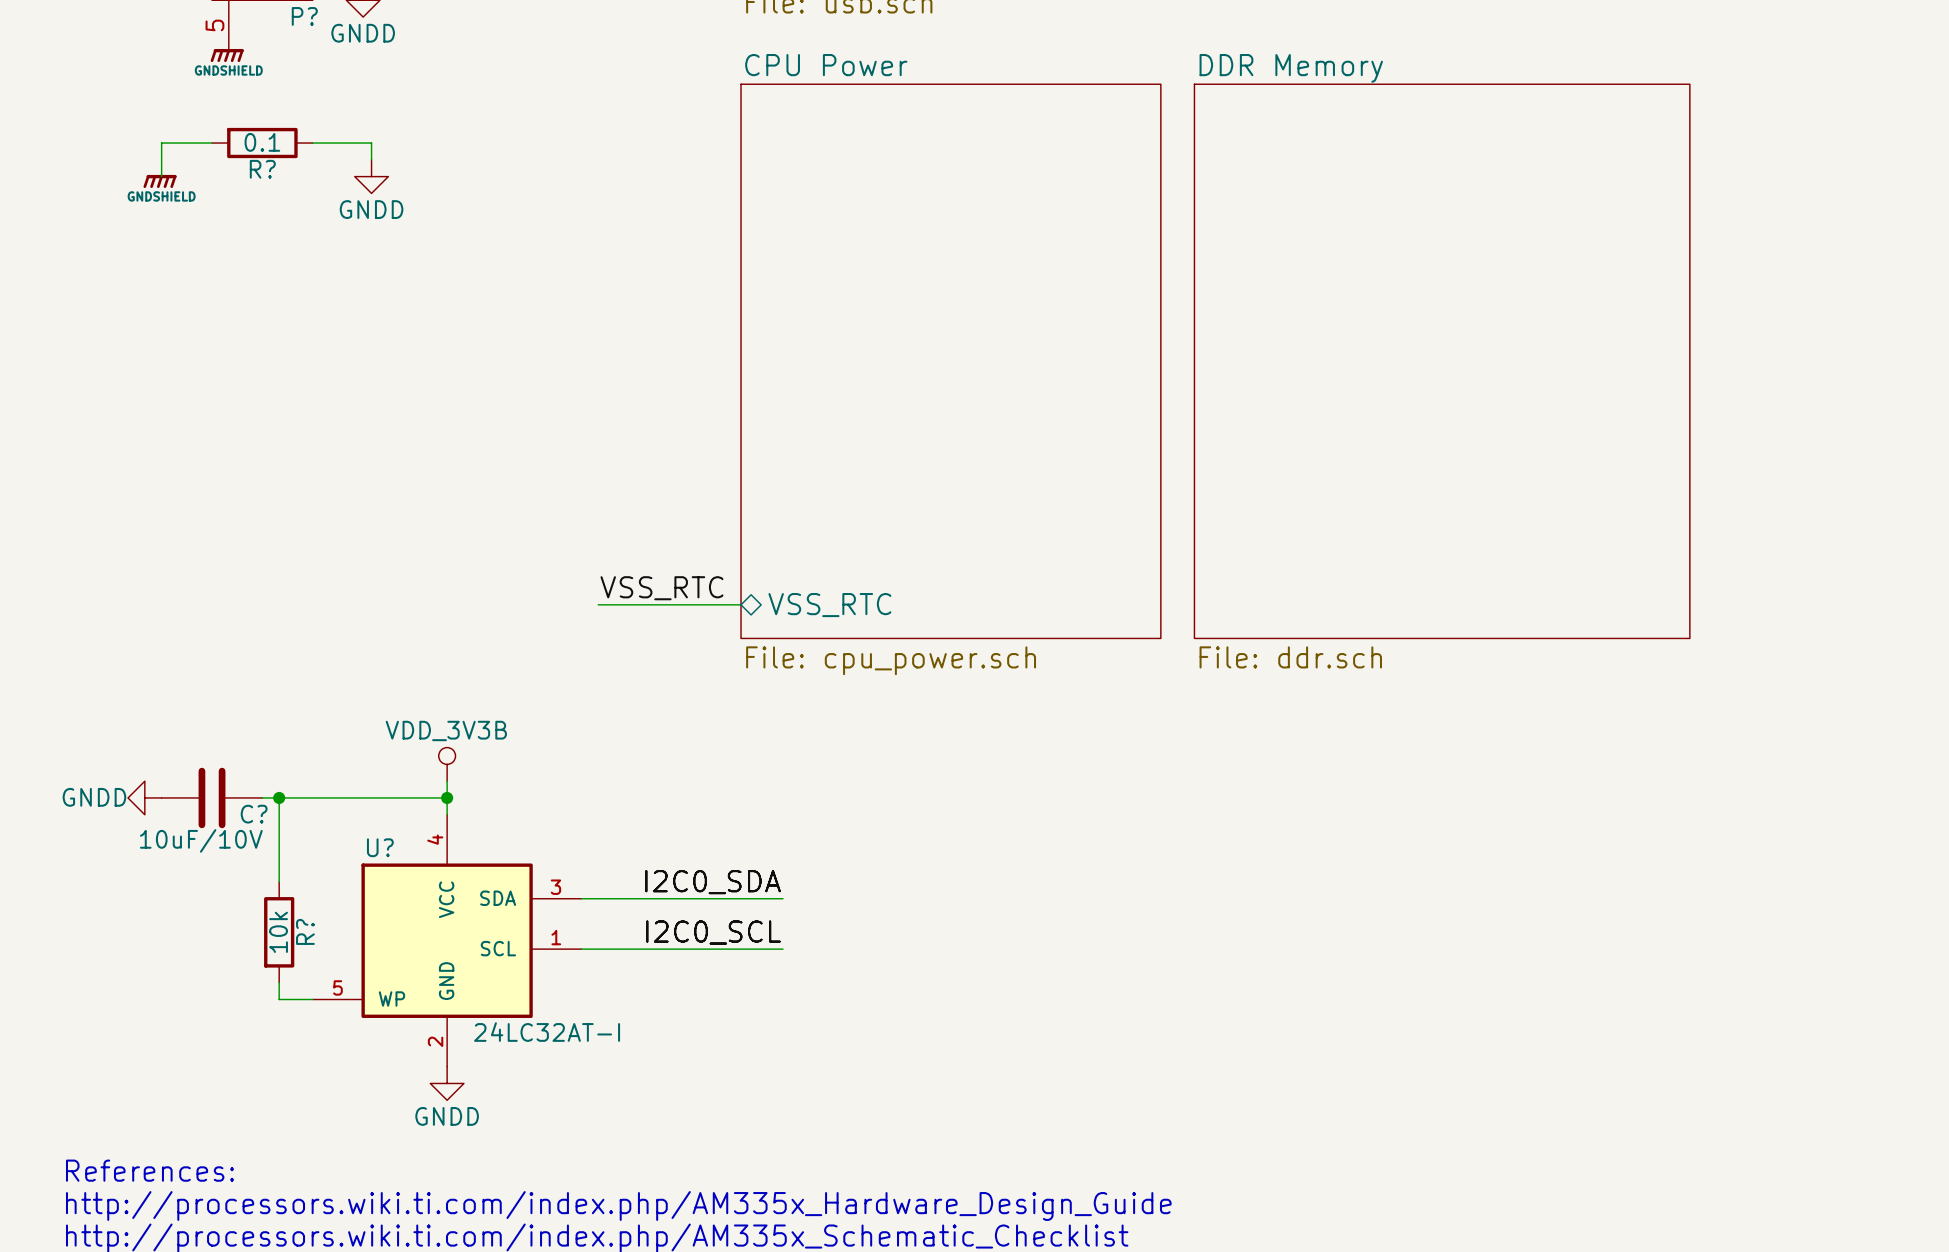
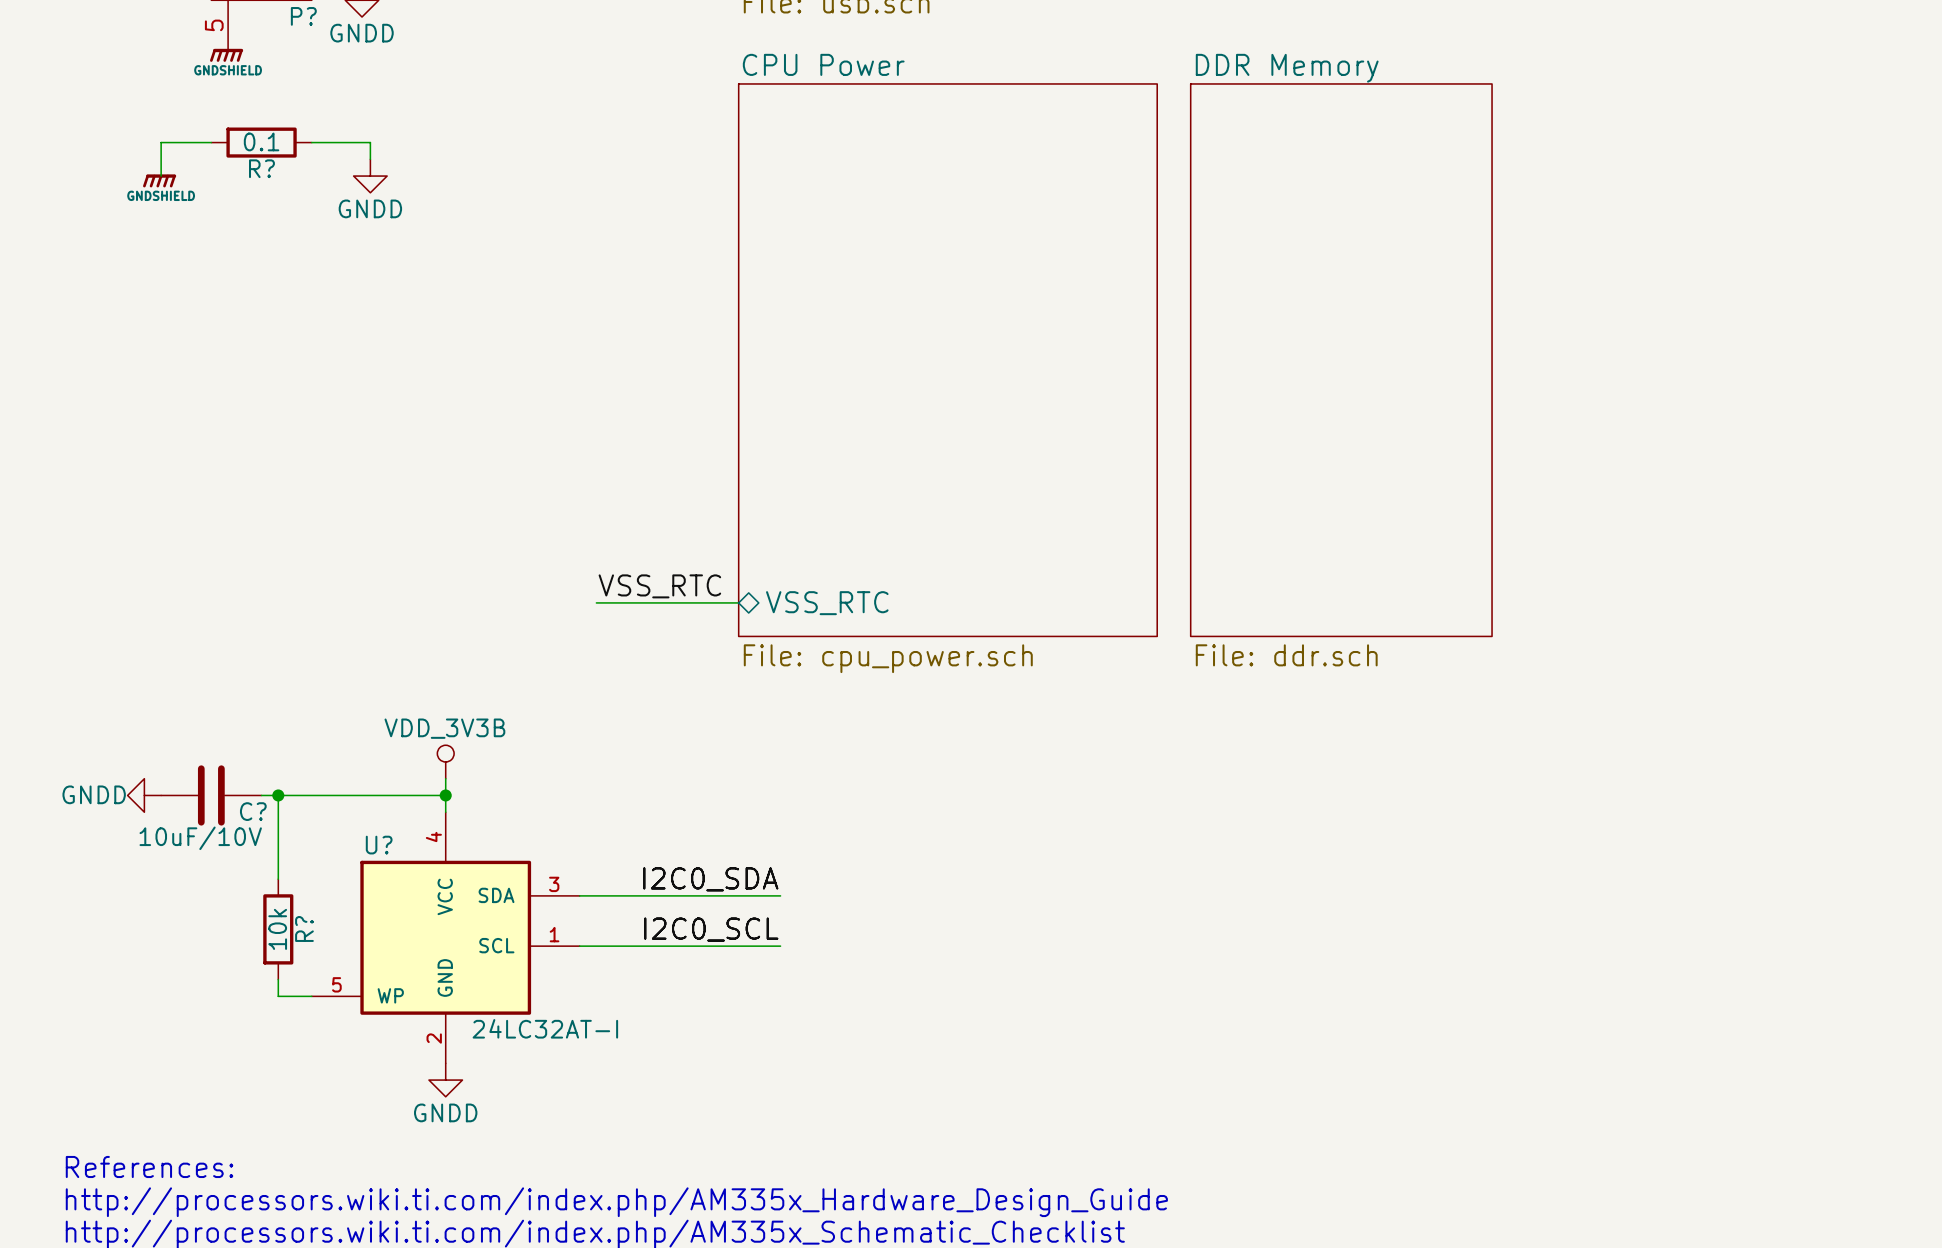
sheet DDR Memory: none -> File: ddr.sch (1341, 360)
sheet DDR Memory: File: ddr.sch (1442, 361) -> none

